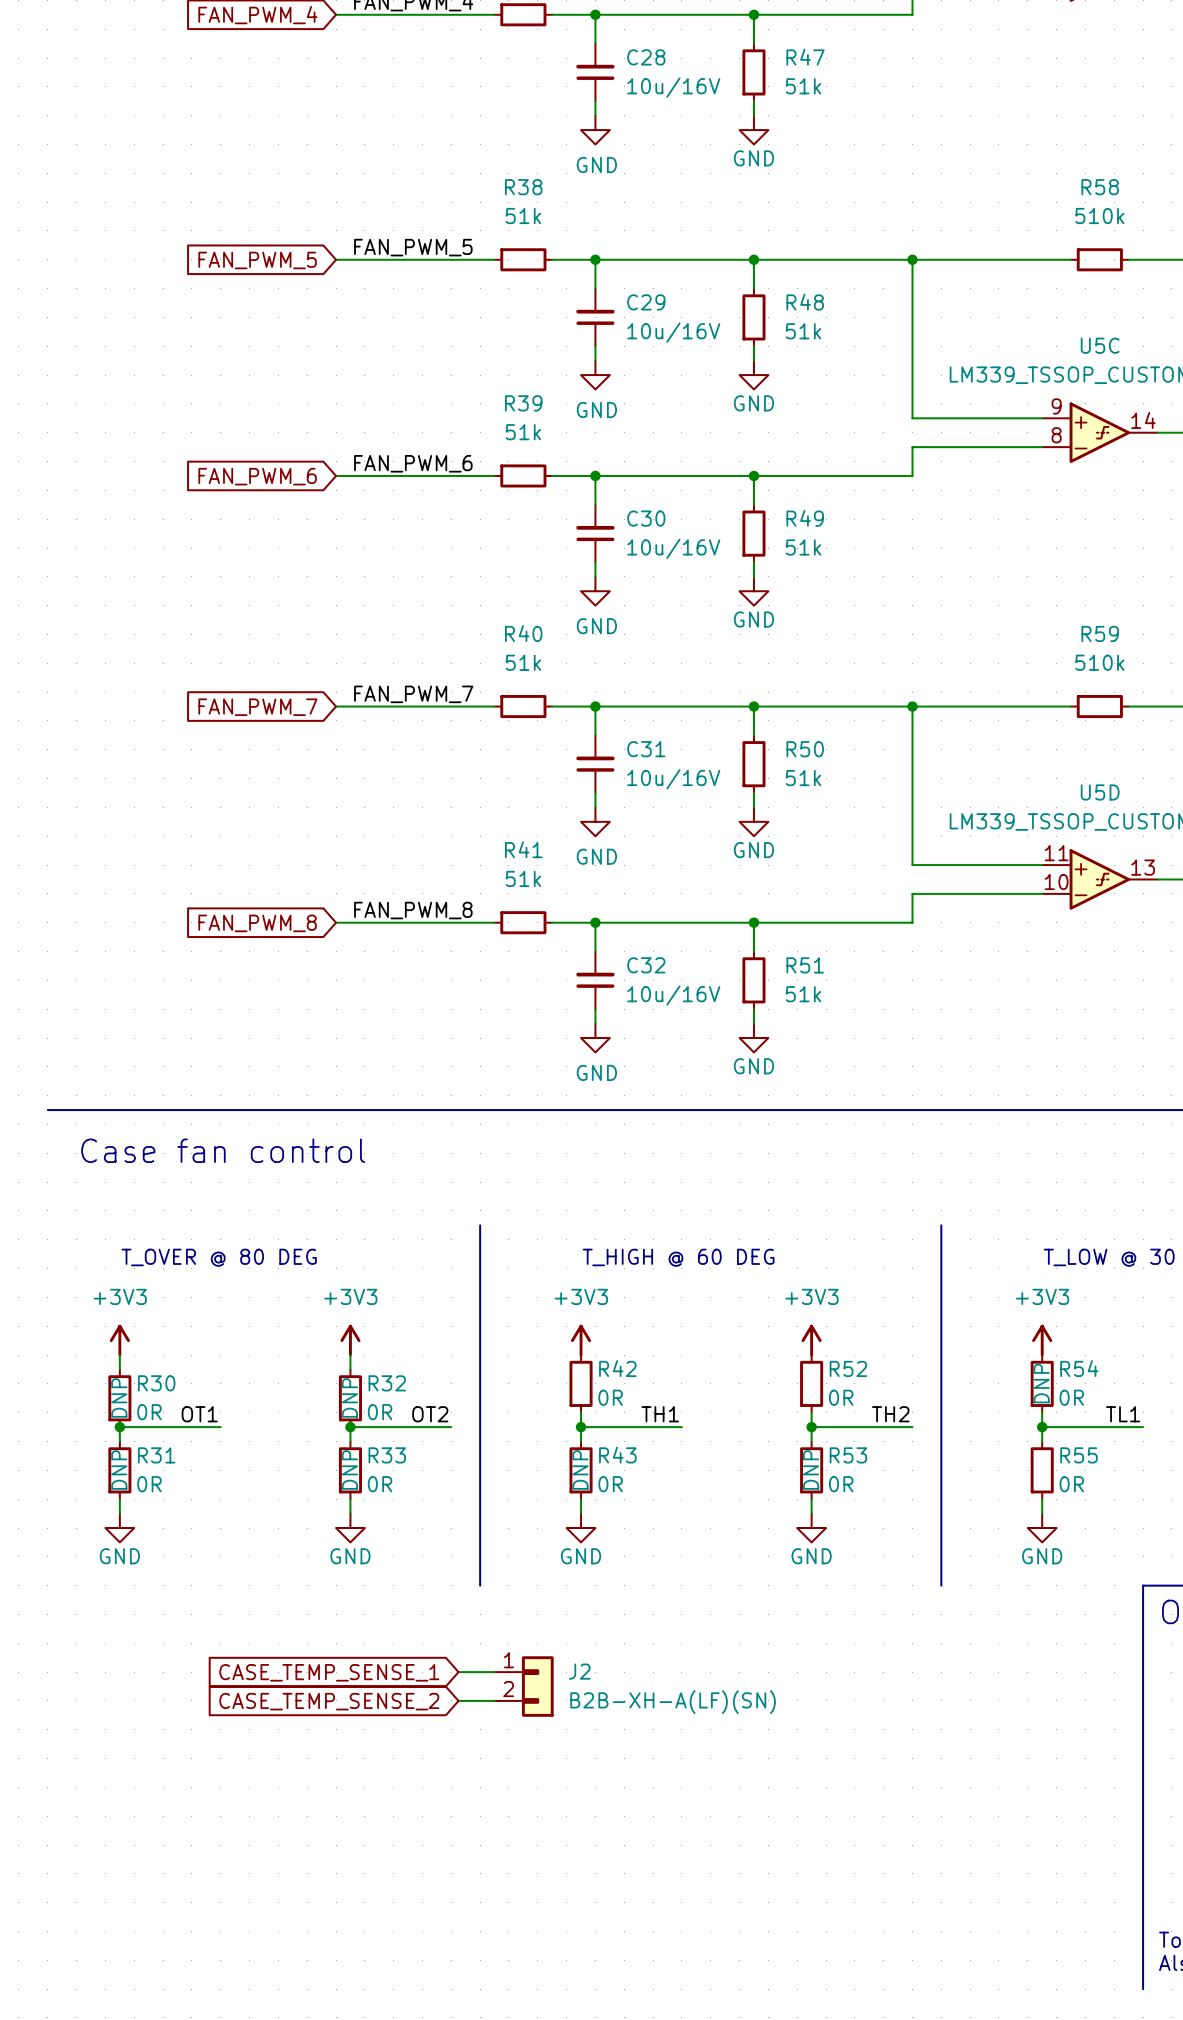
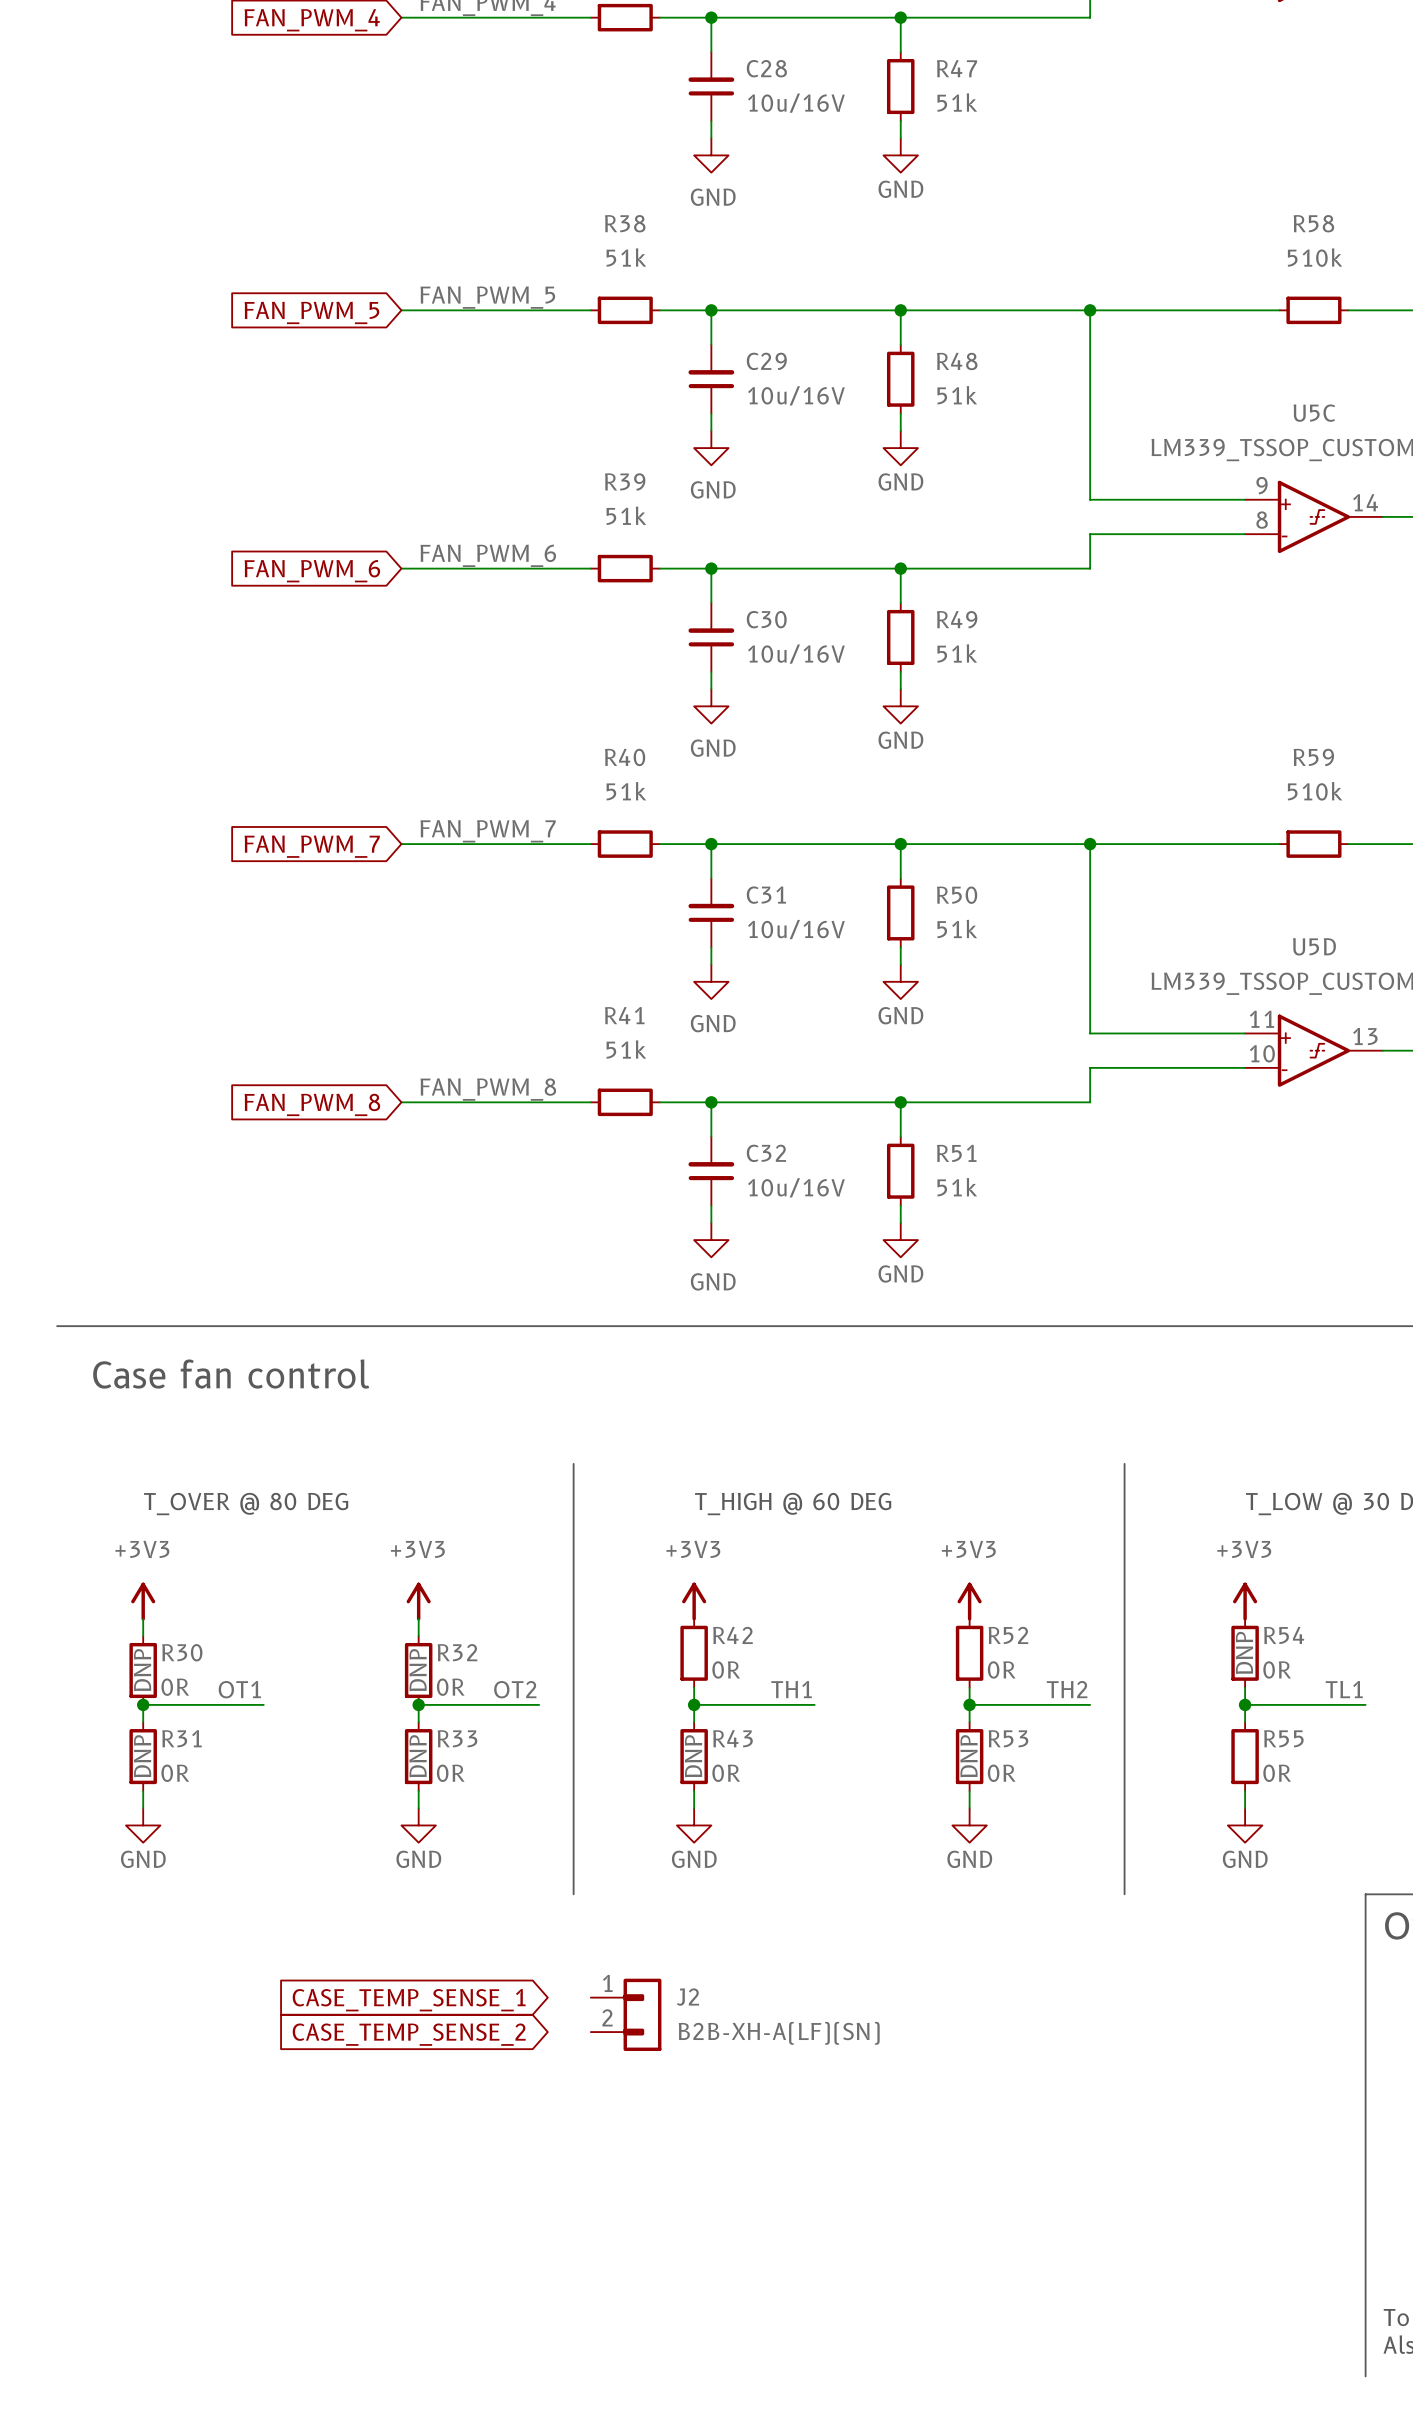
wire: (458, 1672) (494, 1672) -> none
wire: (458, 1700) (494, 1700) -> none

